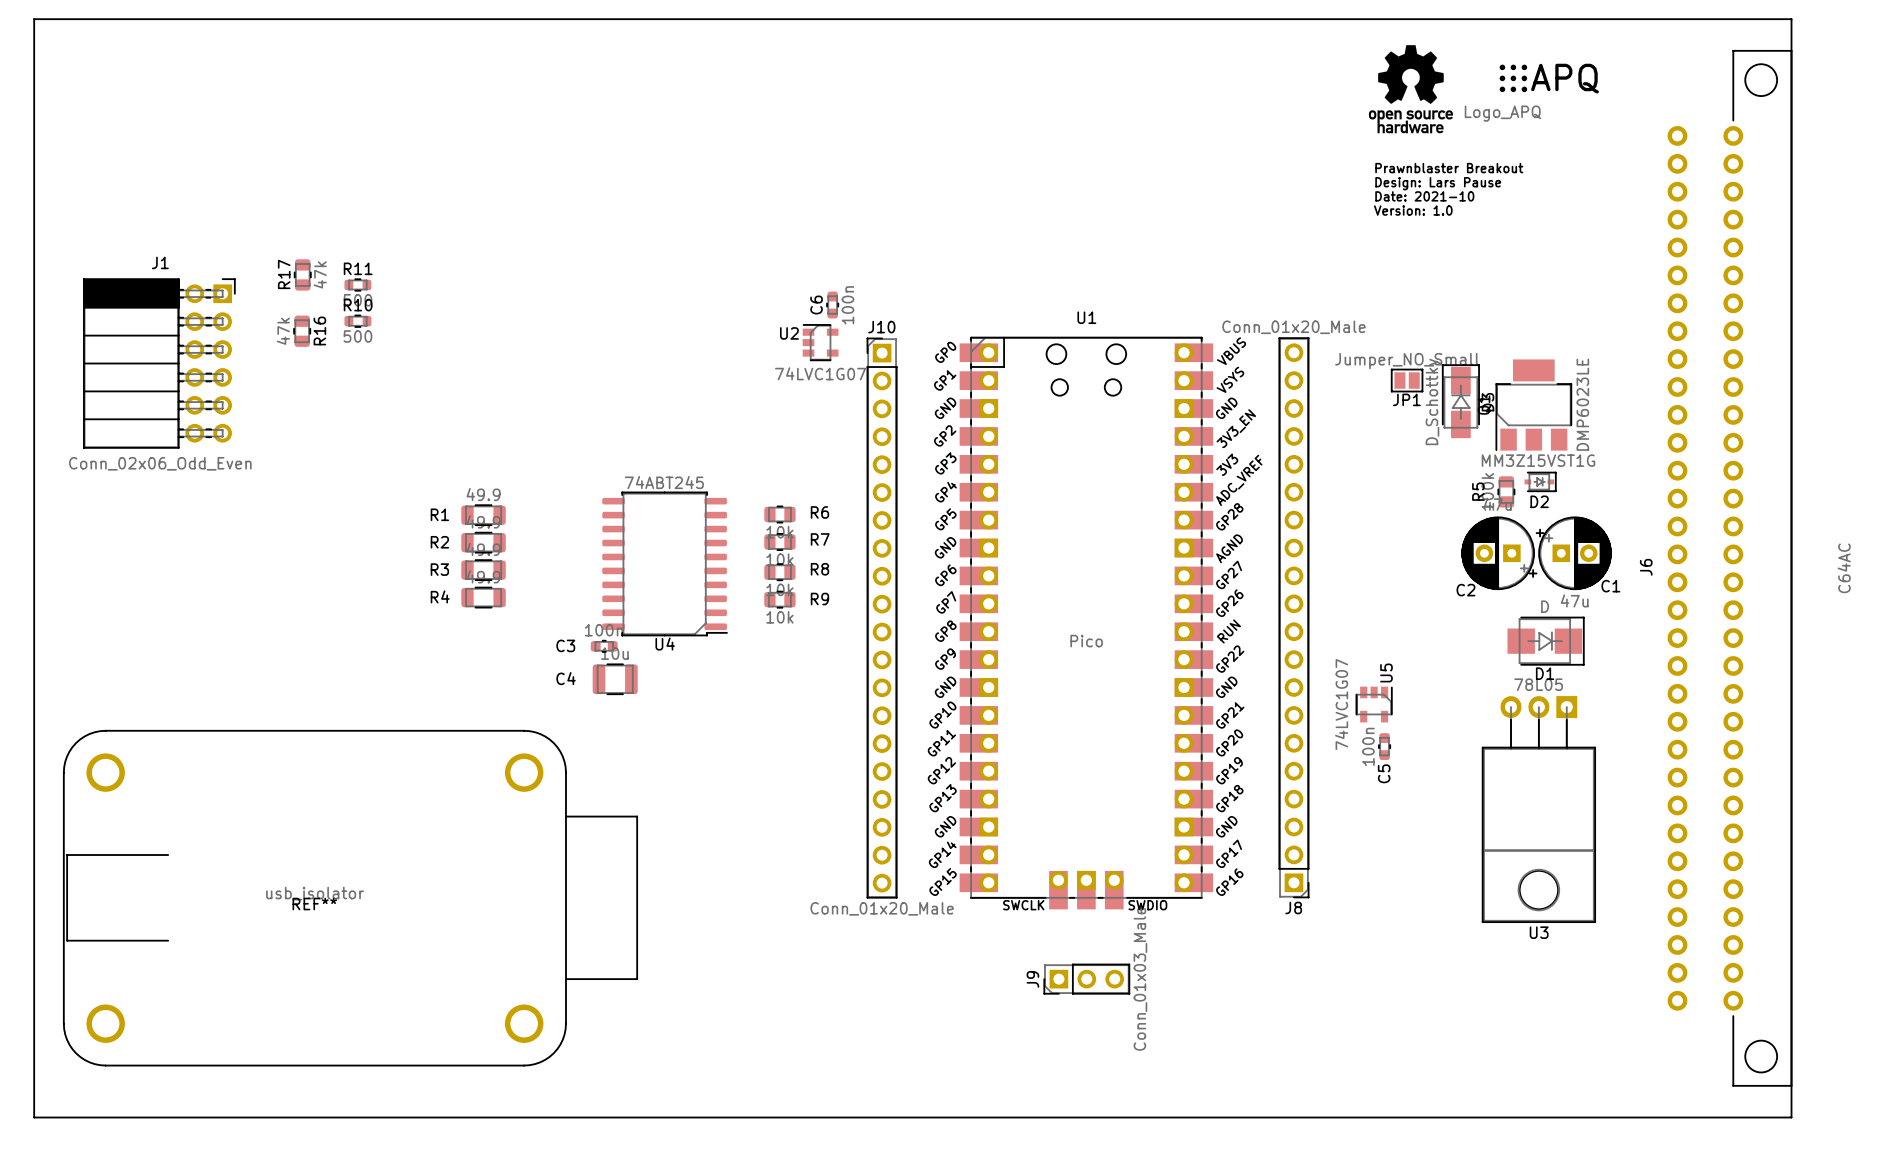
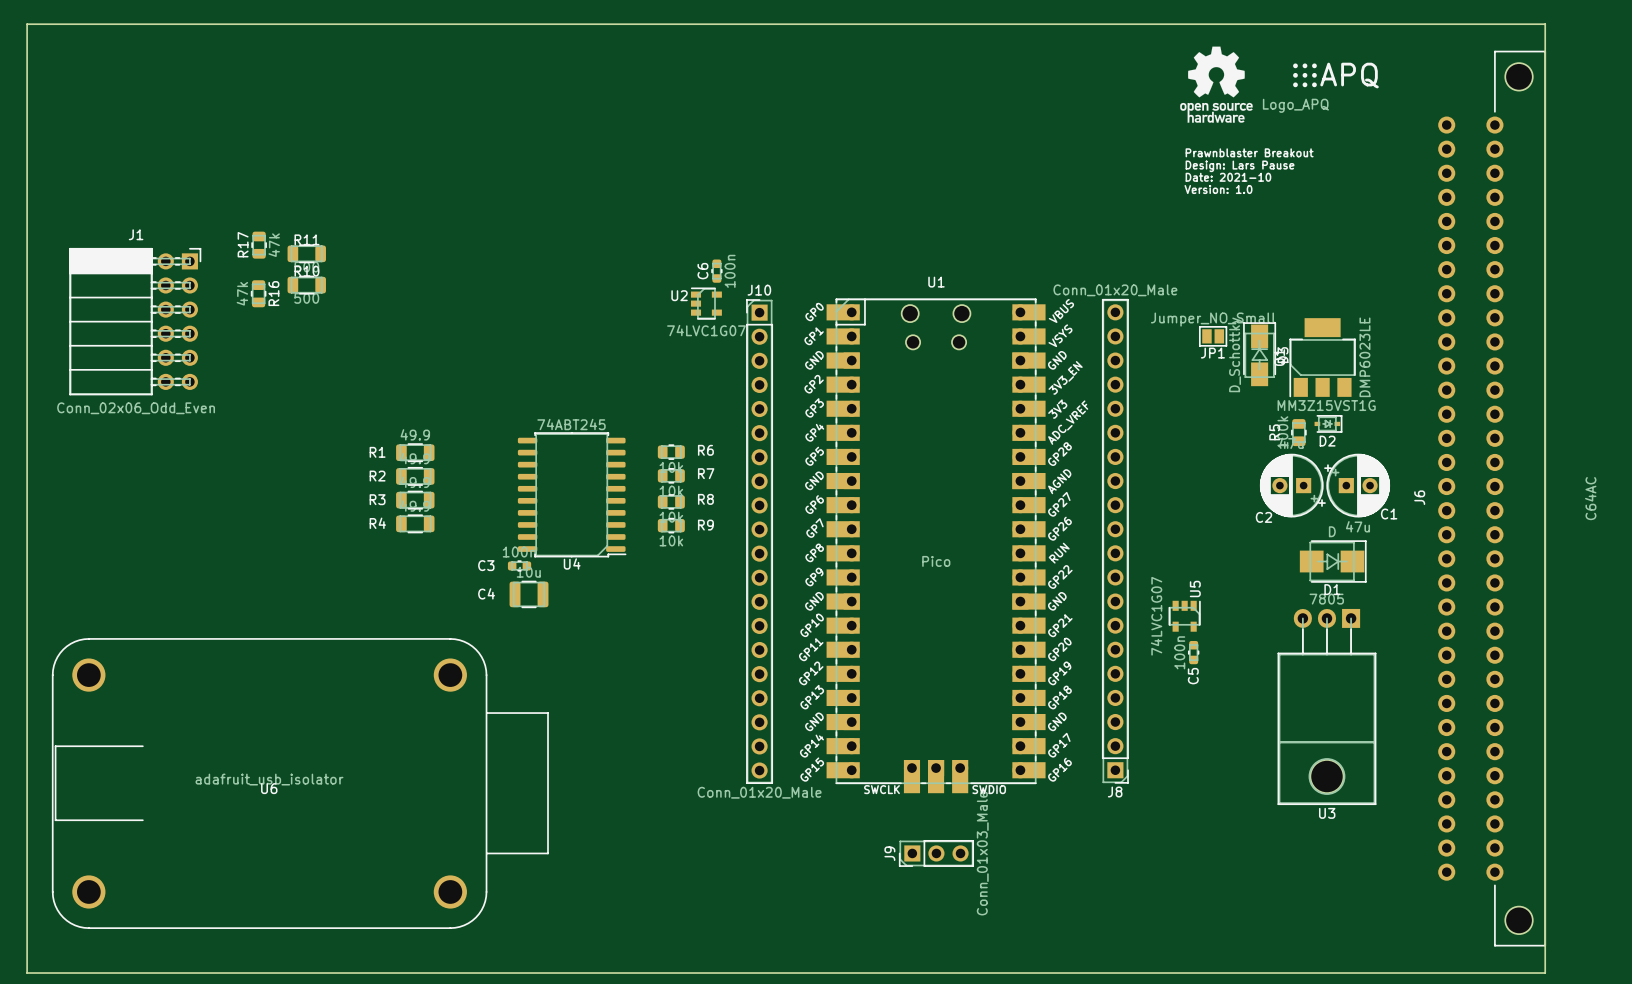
R11 footprint: [344, 278, 372, 292] -> [287, 244, 326, 264]
R10 footprint: [344, 314, 372, 328] -> [287, 275, 326, 295]
U3 value: 78L05 (1538, 684) -> 7805 (1326, 599)
REF** value: usb_isolator (315, 893) -> adafruit_usb_isolator (269, 779)
REF** name: REF** (314, 904) -> U6 (269, 788)

